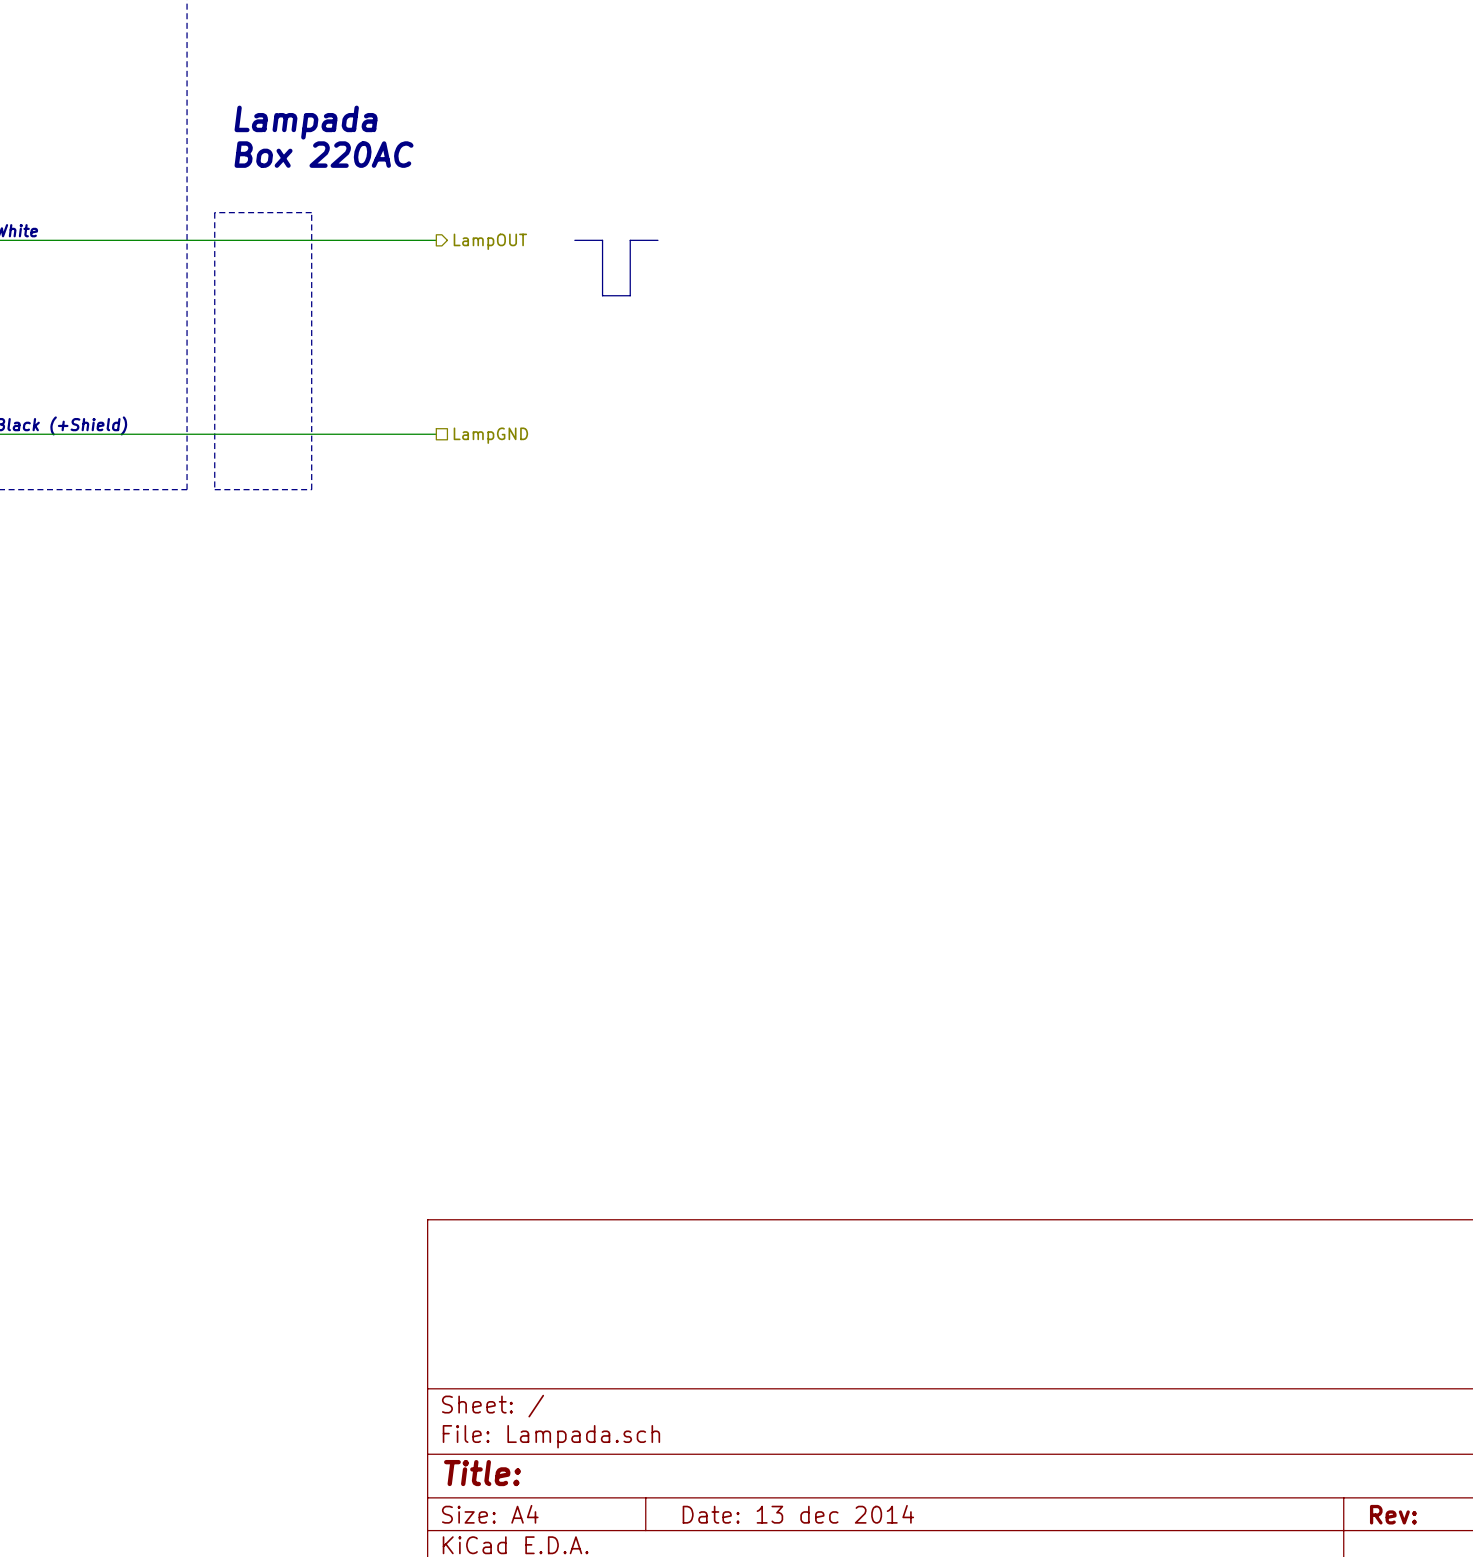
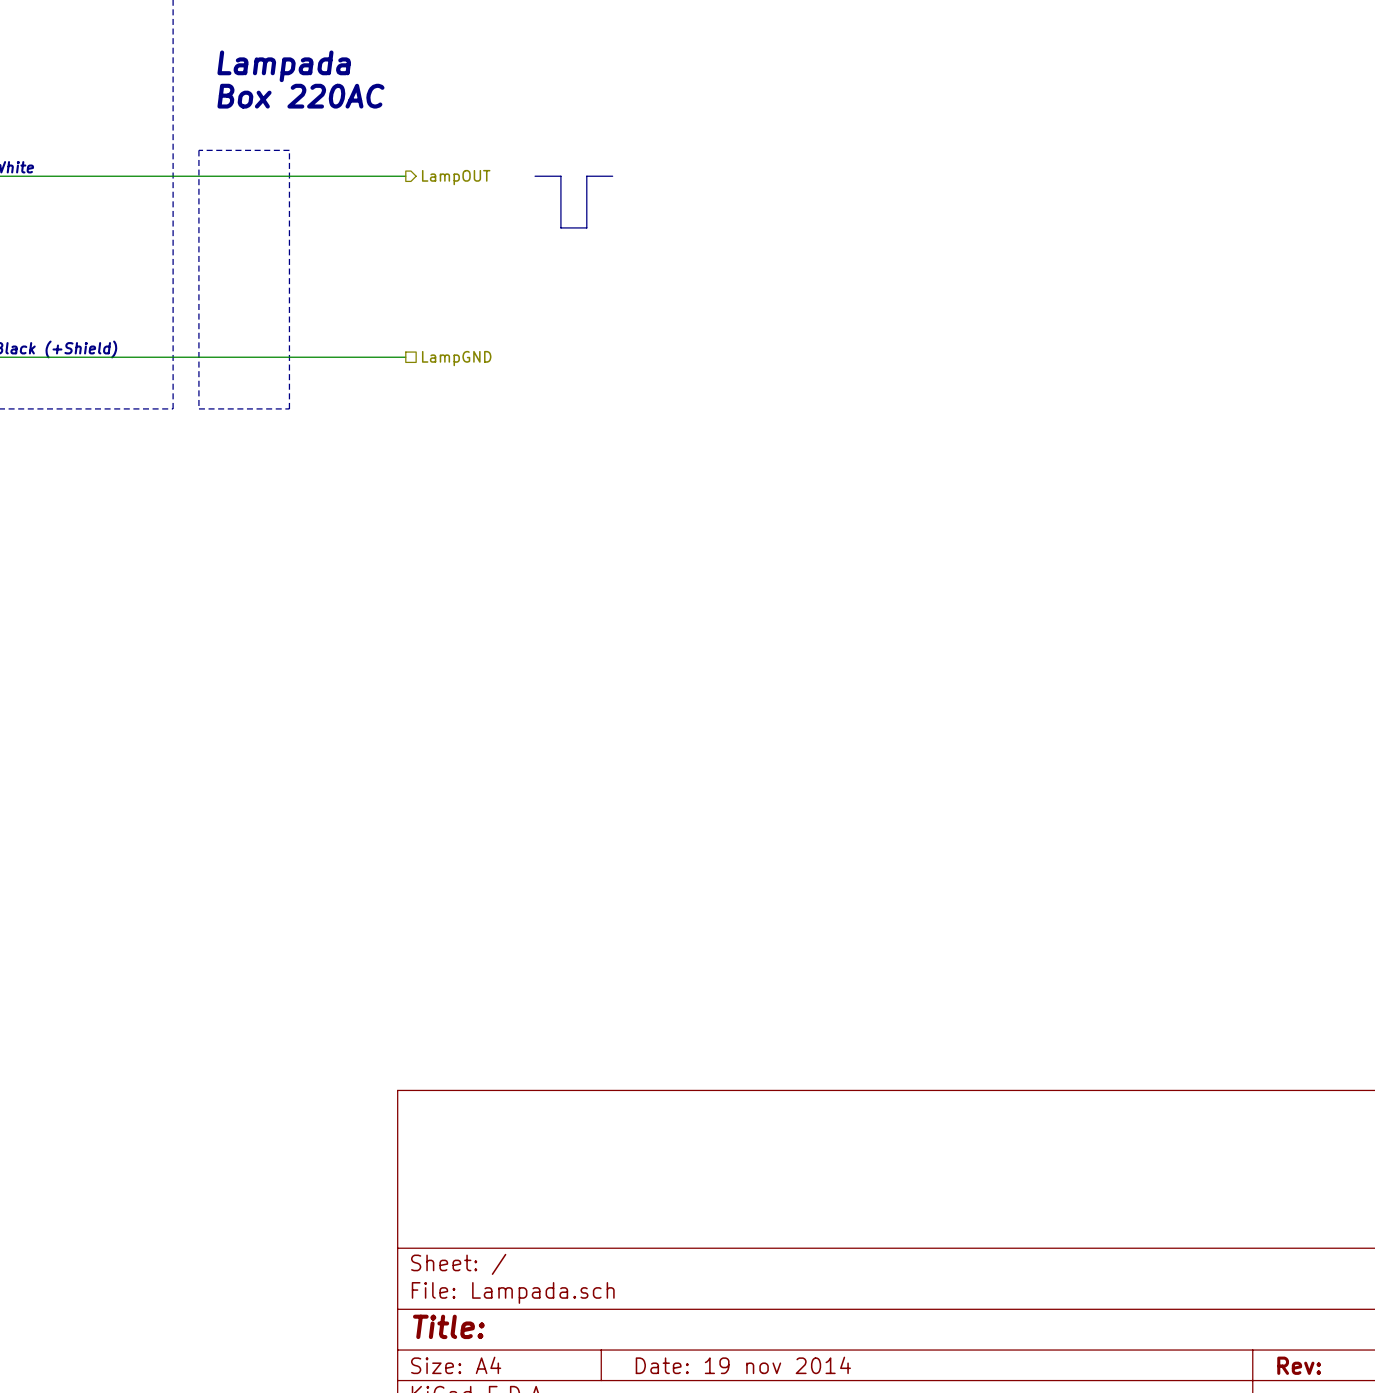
title block: Date: 13 dec 2014 (798, 1514) -> Date: 19 nov 2014 (743, 1365)

